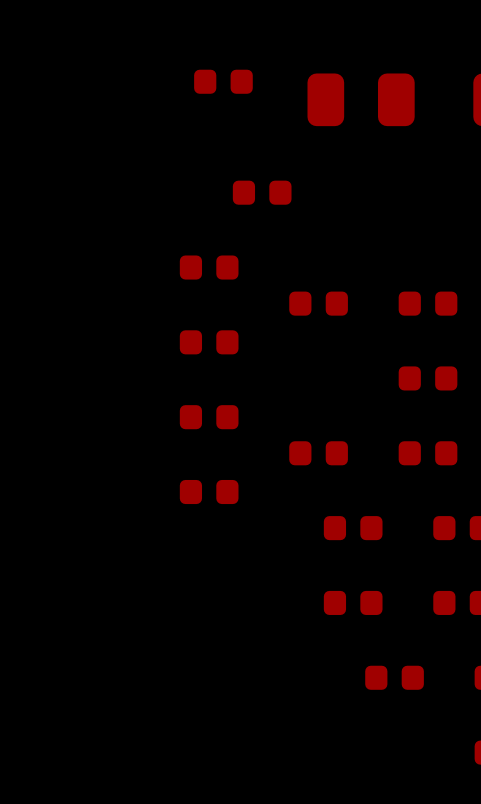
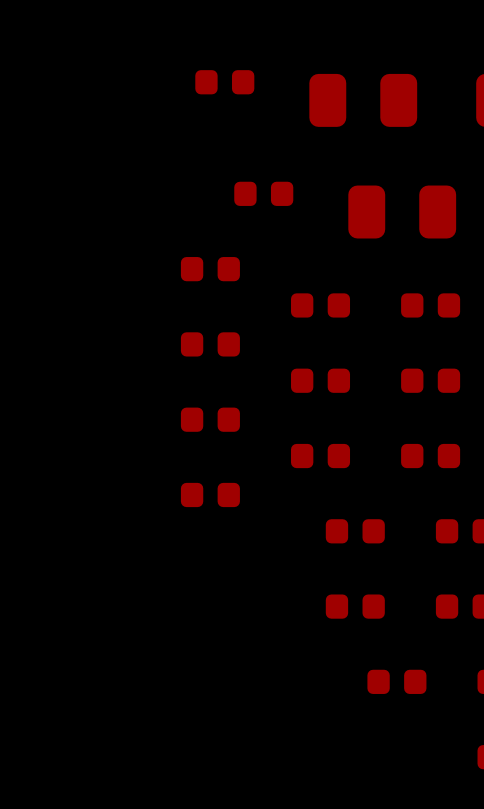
part: none -> (402, 212)
part: none -> (320, 380)

